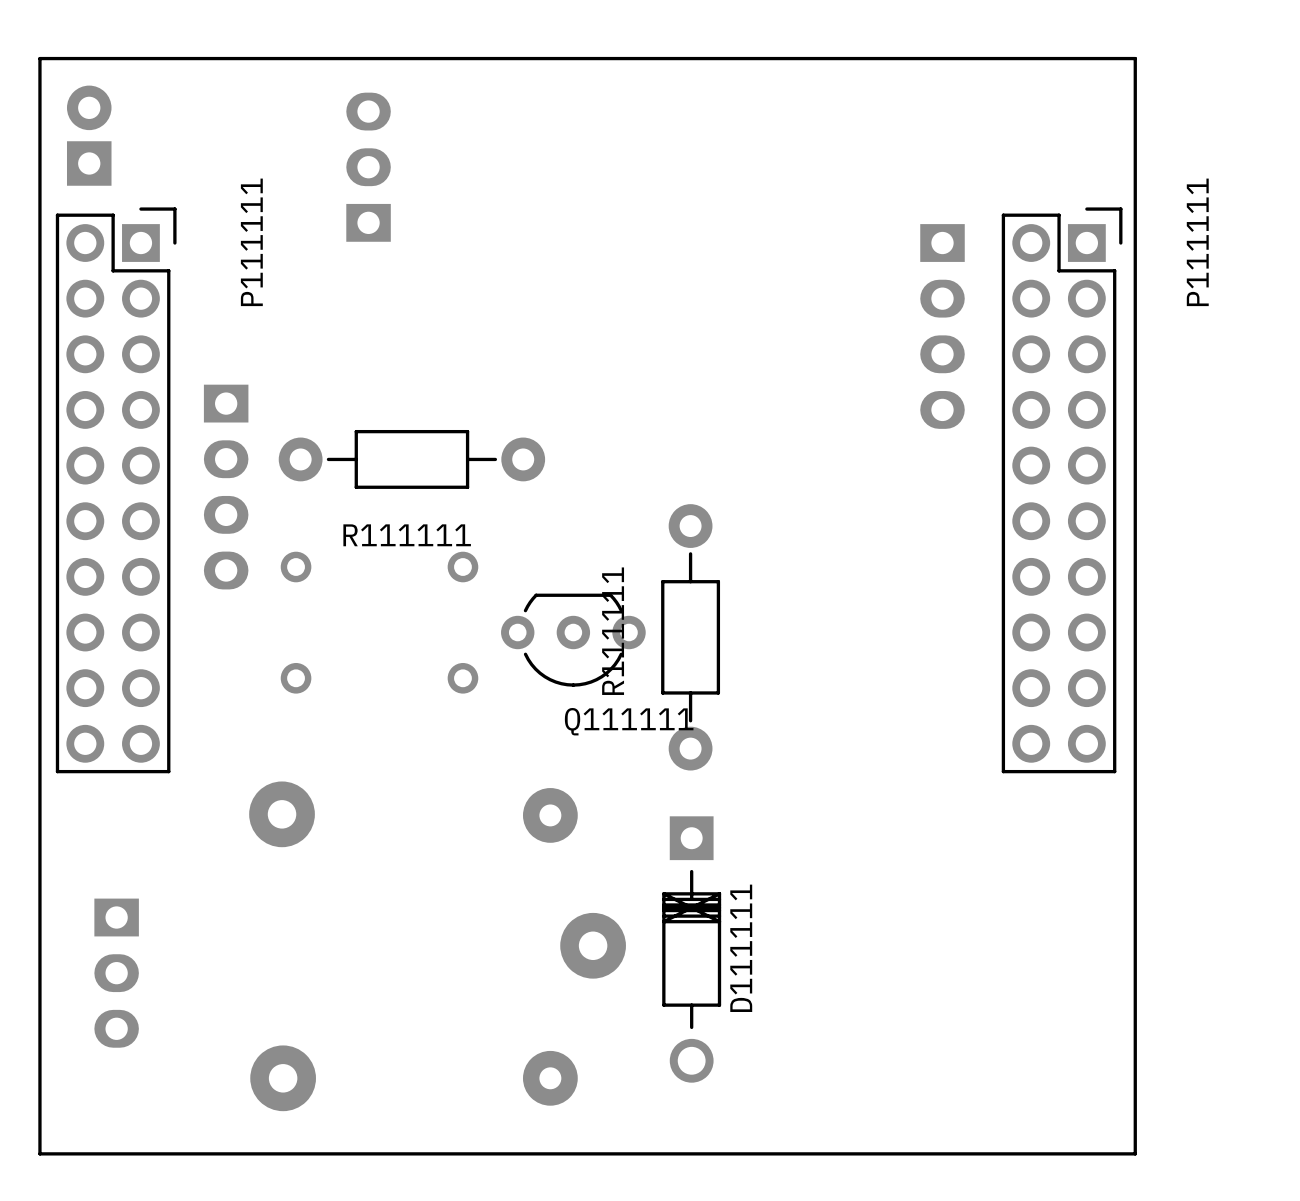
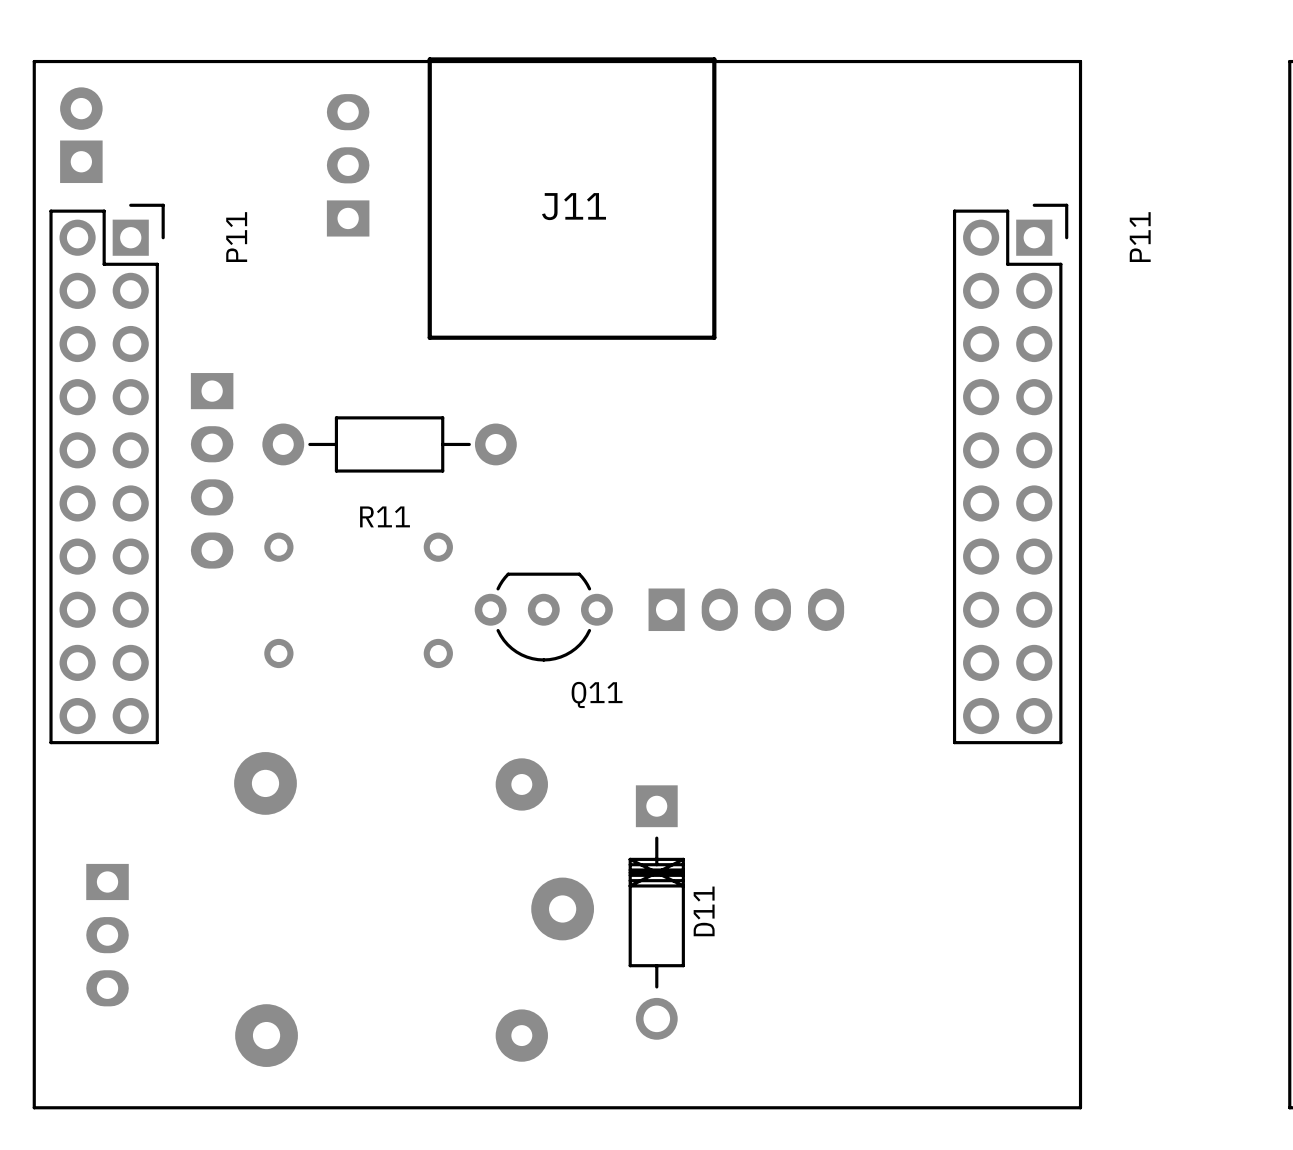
J11: none -> (572, 198)
P111111 name: P111111 (251, 242) -> P11 (236, 237)
P111111 name: P111111 (1197, 242) -> P11 (1140, 237)
part rotation: 0° (942, 326) -> 90° counterclockwise (746, 609)
part position: (942, 326) -> (746, 609)
R111111 name: R111111 (407, 535) -> R11 (385, 516)
R111111: (690, 637) -> none
Q111111 name: Q111111 (629, 721) -> Q11 (597, 694)
D111111 name: D111111 (741, 948) -> D11 (704, 911)

